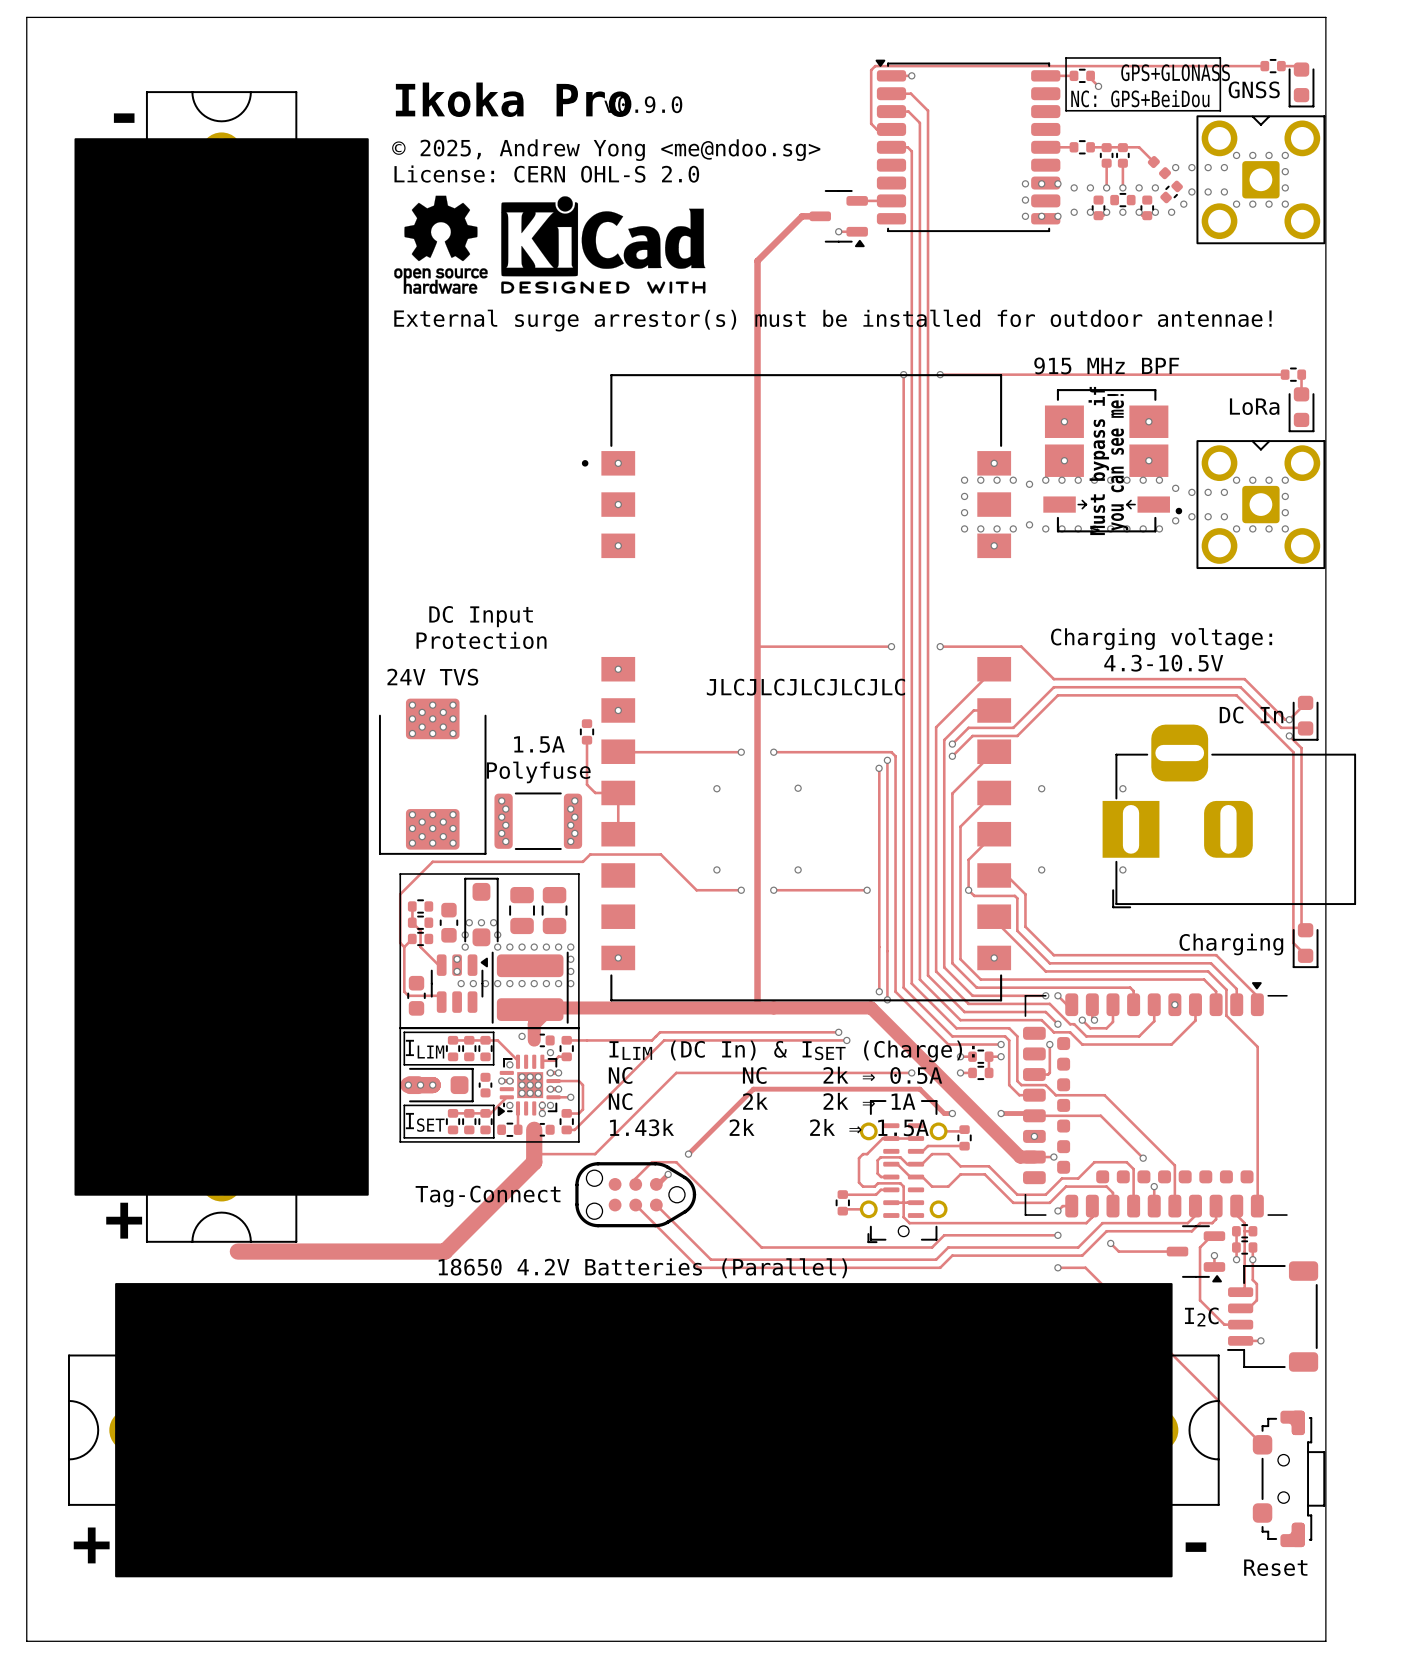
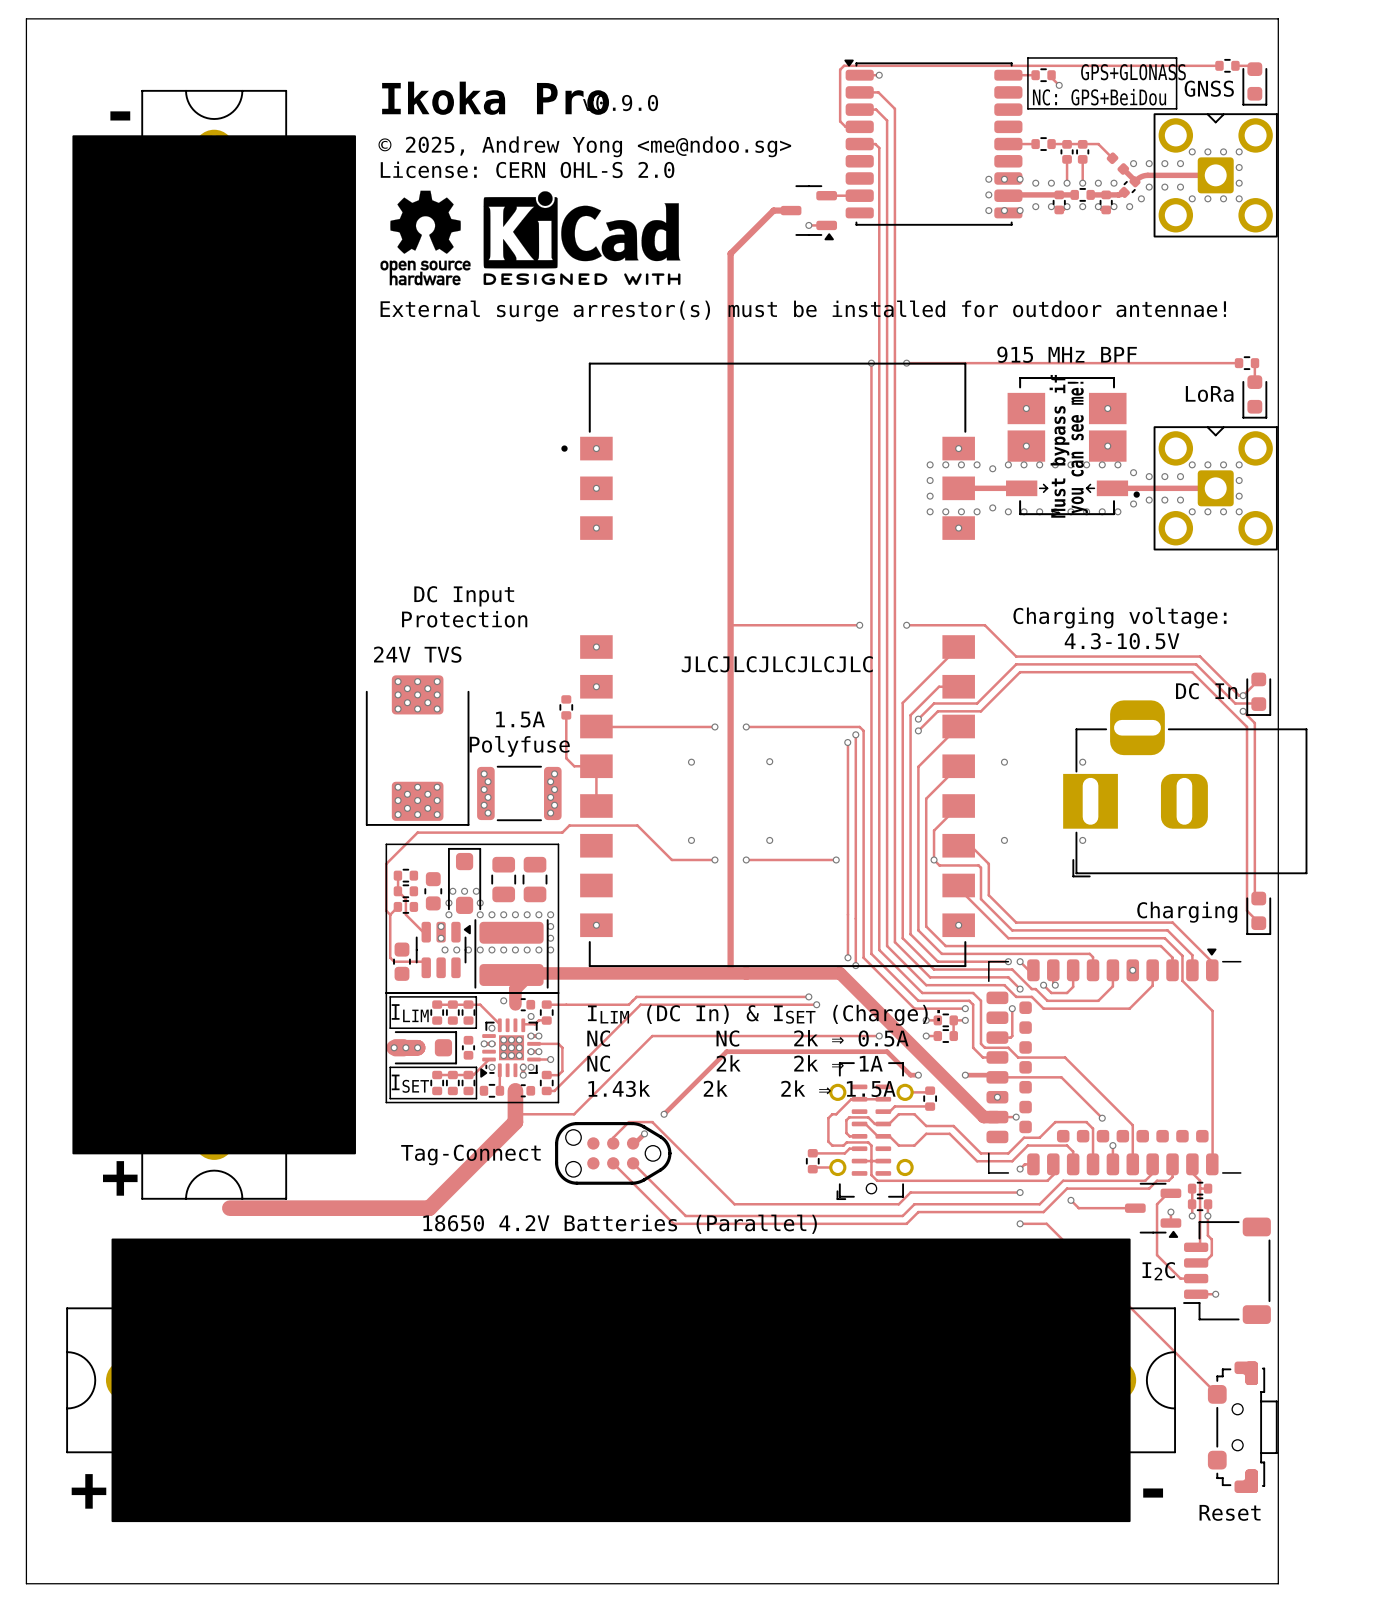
track: none -> (1123, 168) (1134, 181) (1146, 175) (1215, 175)
track: none -> (1124, 192) (1119, 194) (1090, 194)
track: none -> (1009, 194) (1074, 194)
track: none -> (958, 488) (1021, 488)
track: none -> (1112, 488) (1215, 488)

